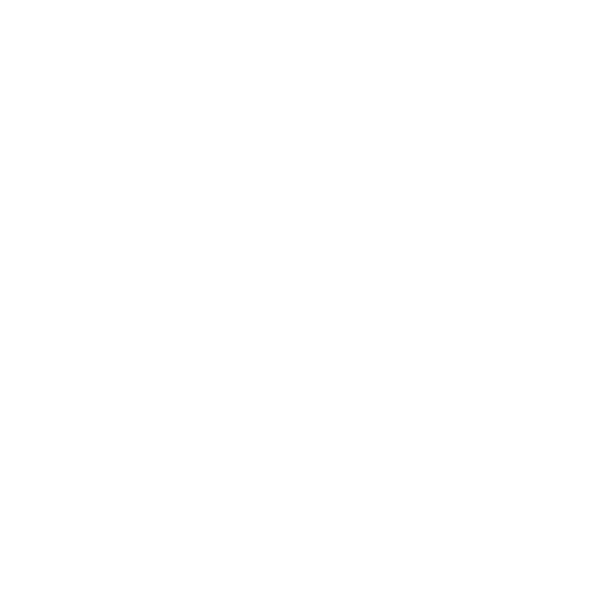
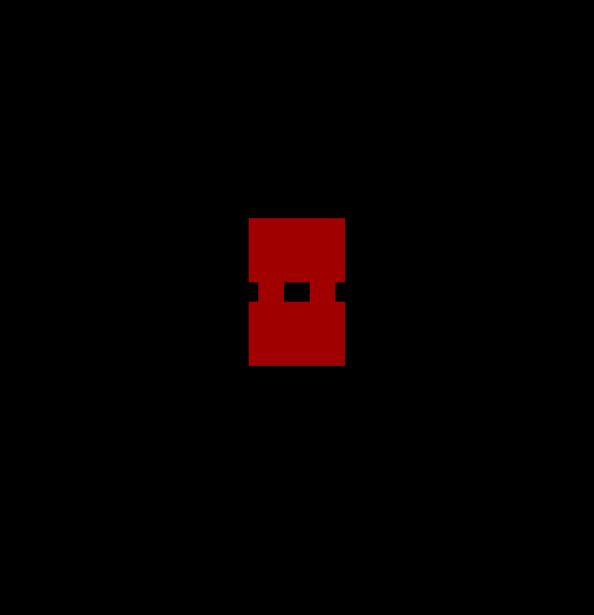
part: none -> (296, 292)

